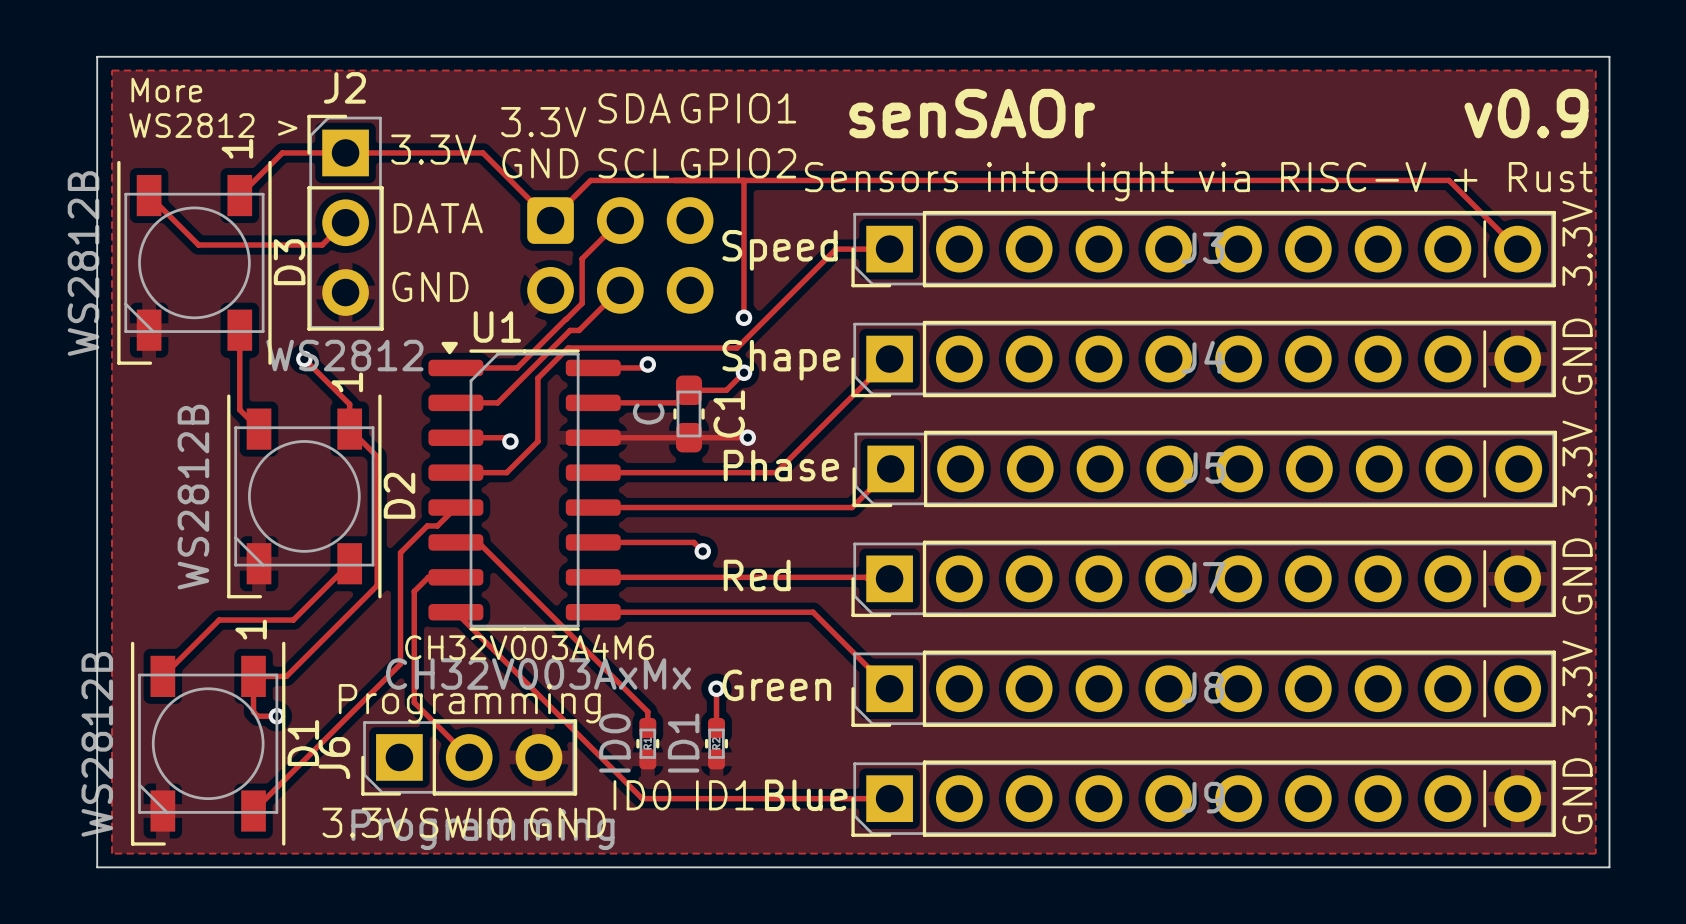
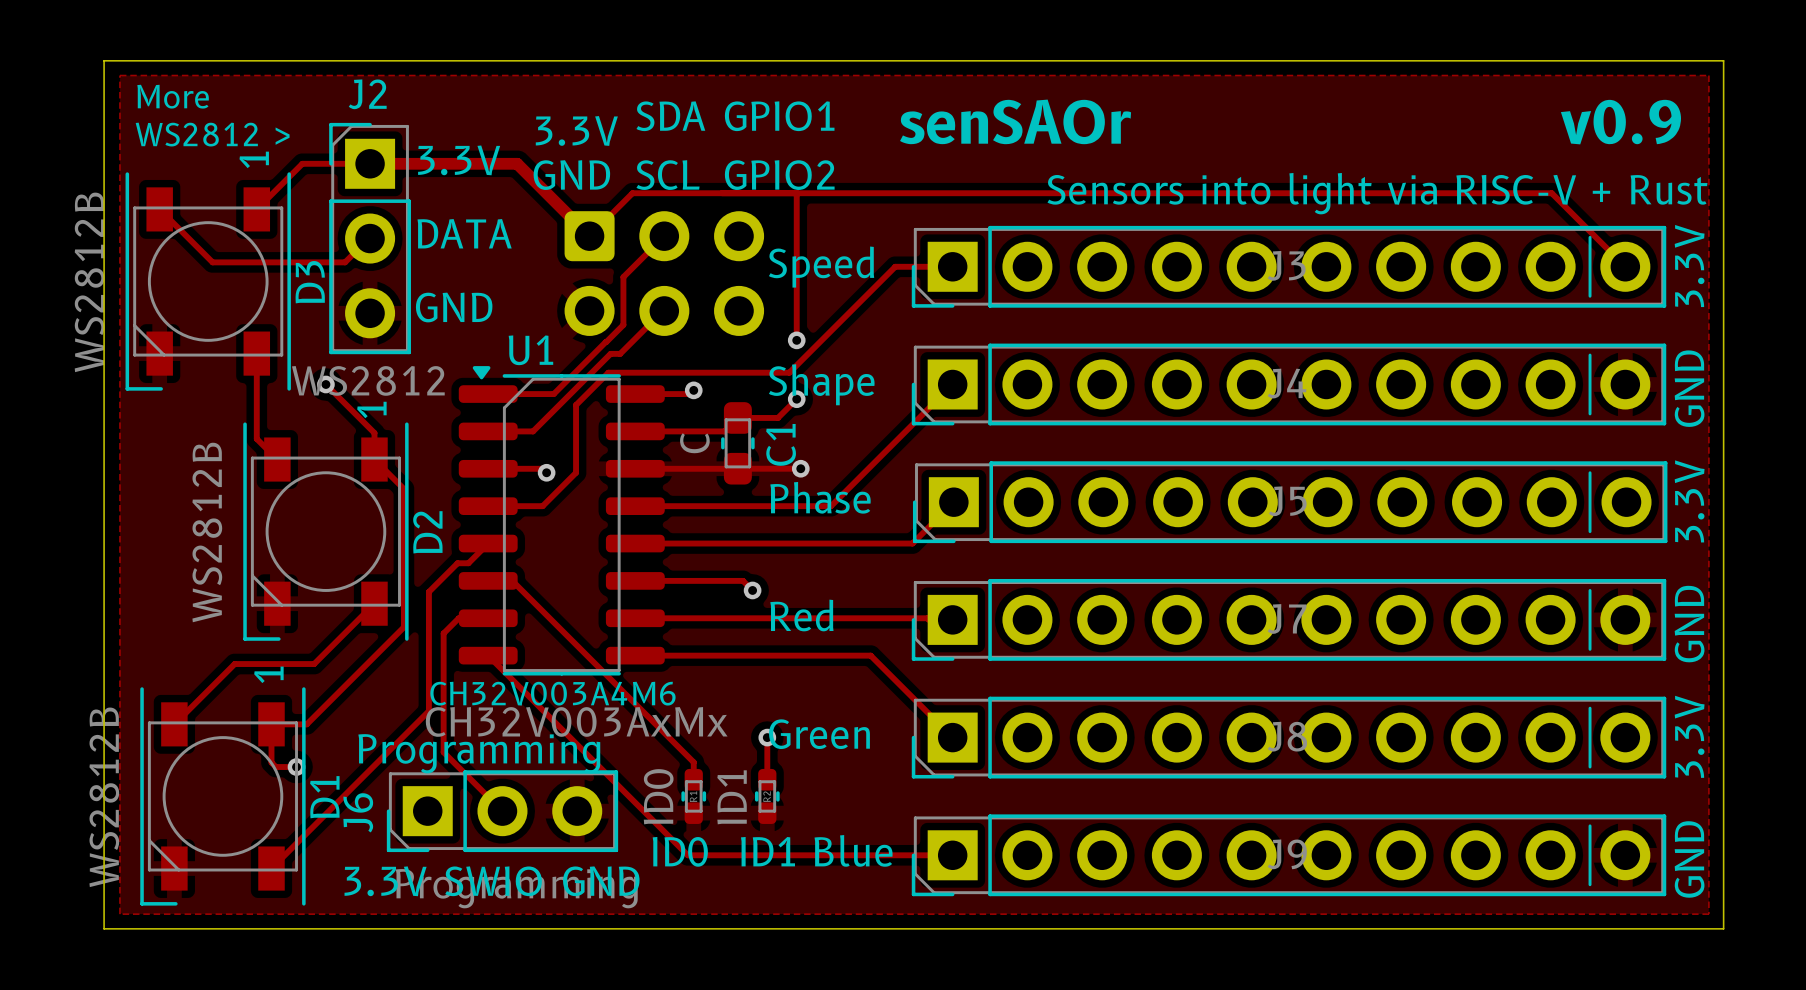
track width: thin (345, 152) (482, 152) (550, 220) -> thick (370, 163) (517, 163) (589, 236)

